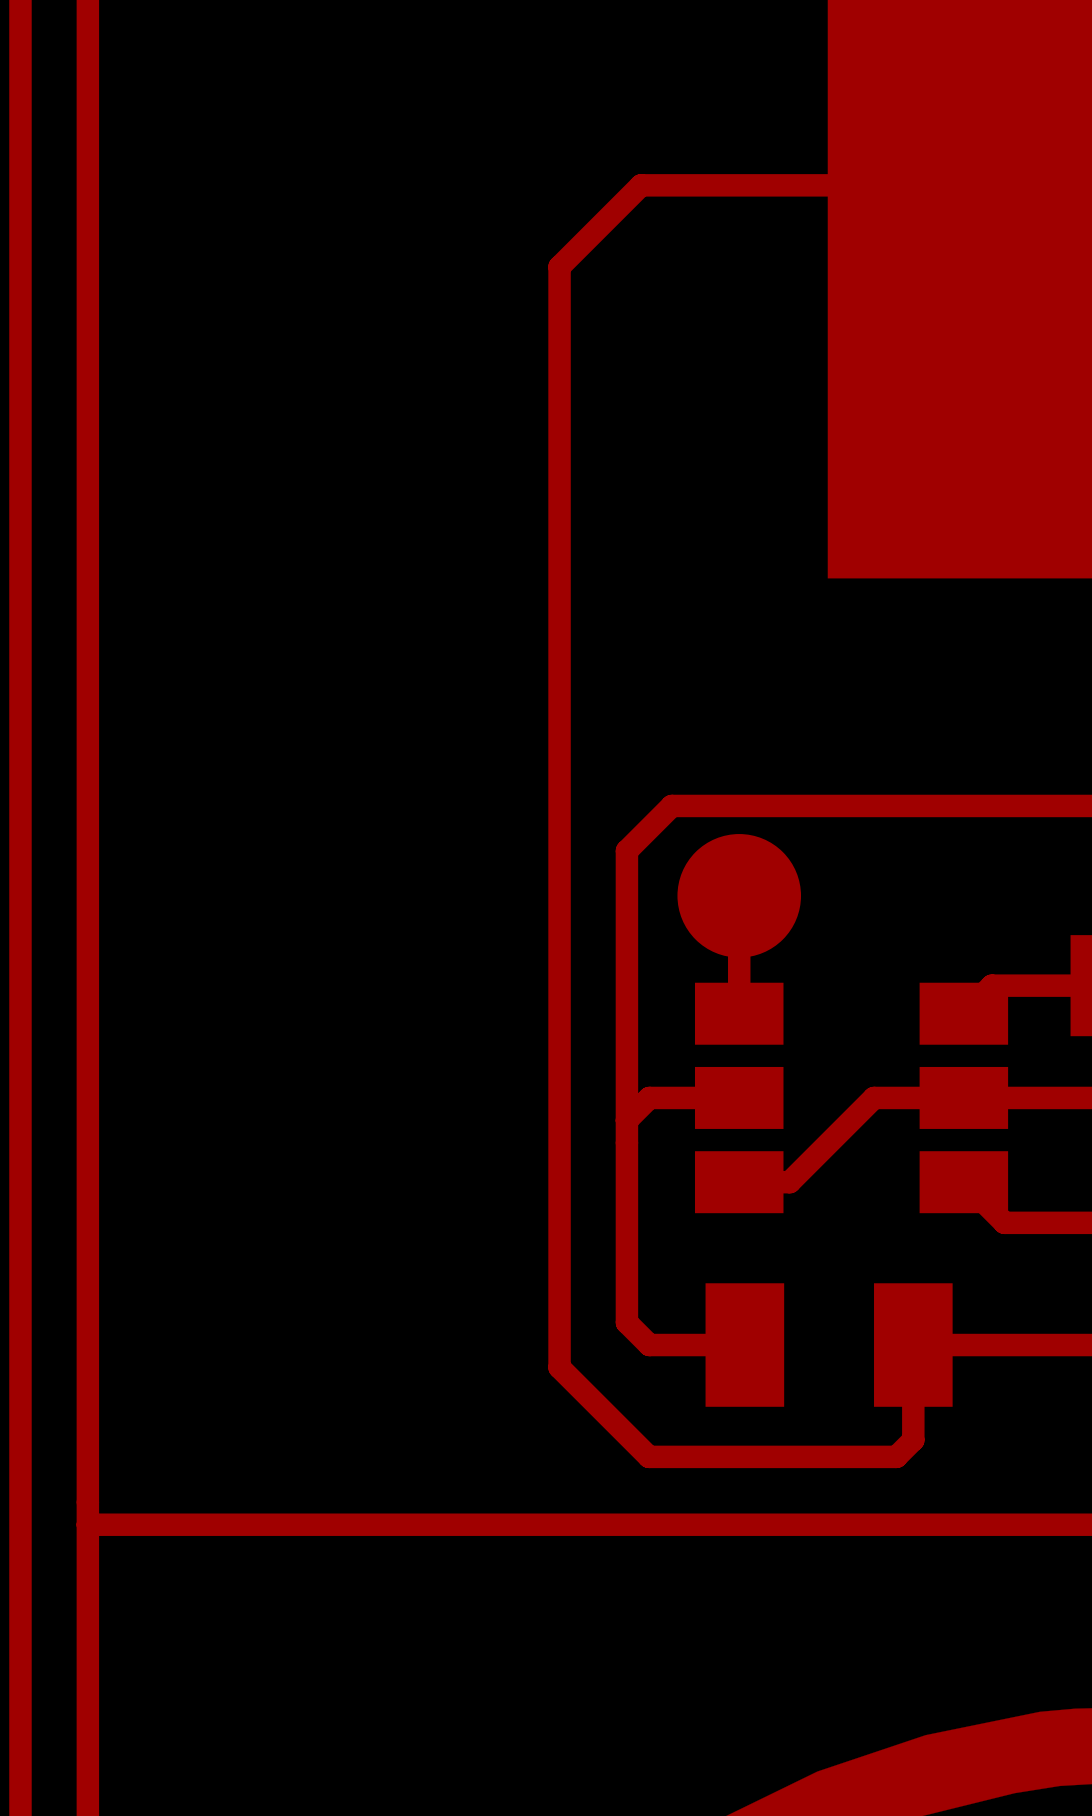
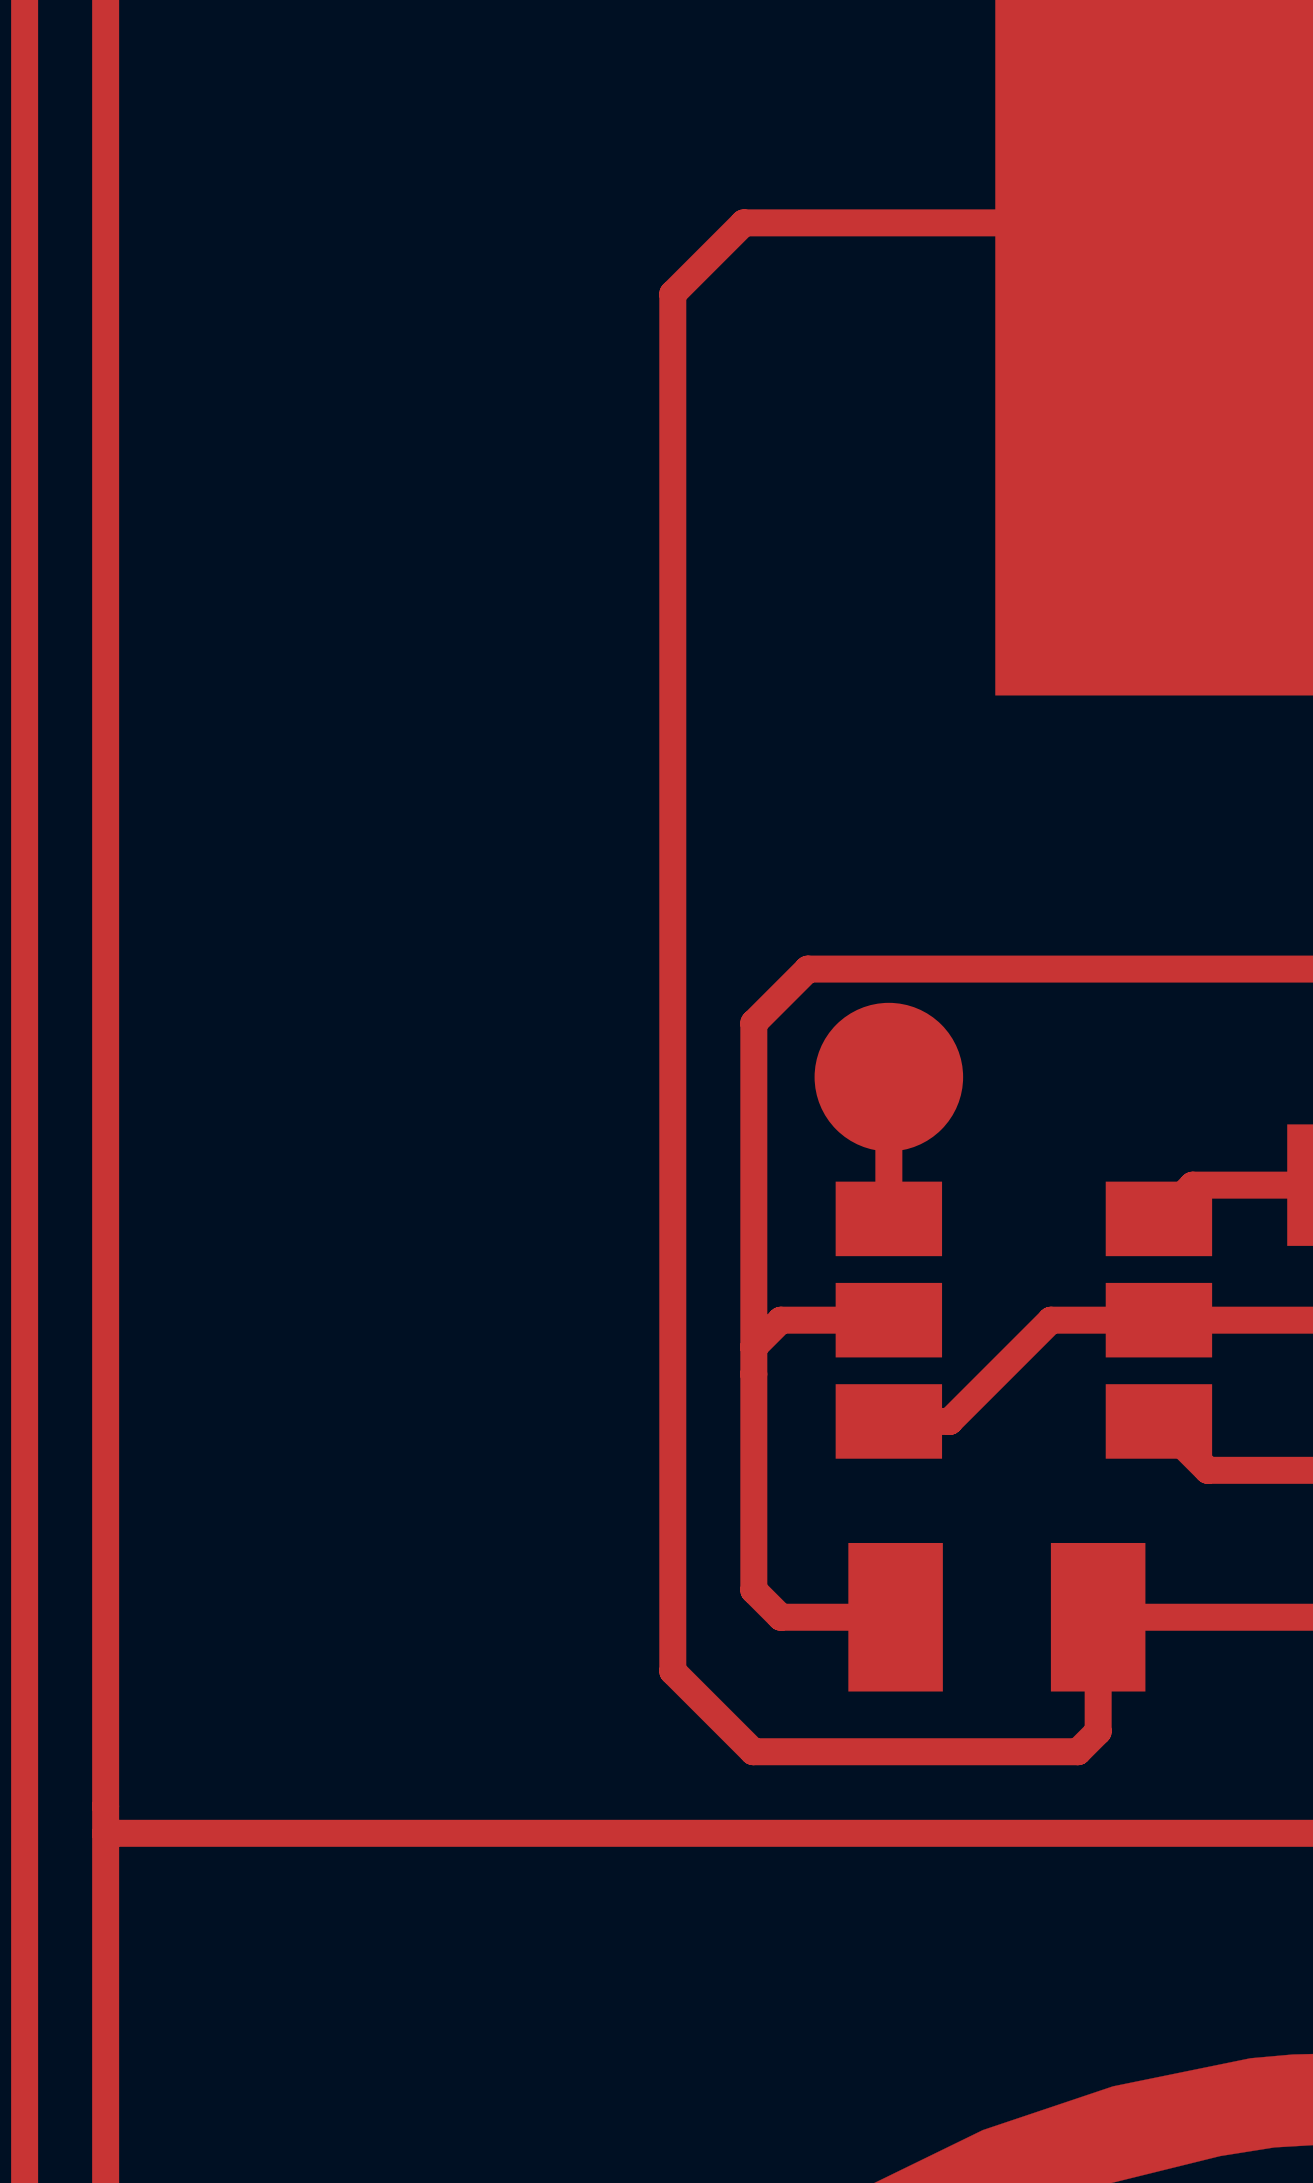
top track: (641, 185) (559, 266) -> (770, 222) (743, 222) (672, 293) (672, 320)
top track: (559, 1367) (648, 1456) -> (672, 1644) (672, 1671) (753, 1751) (780, 1751)

